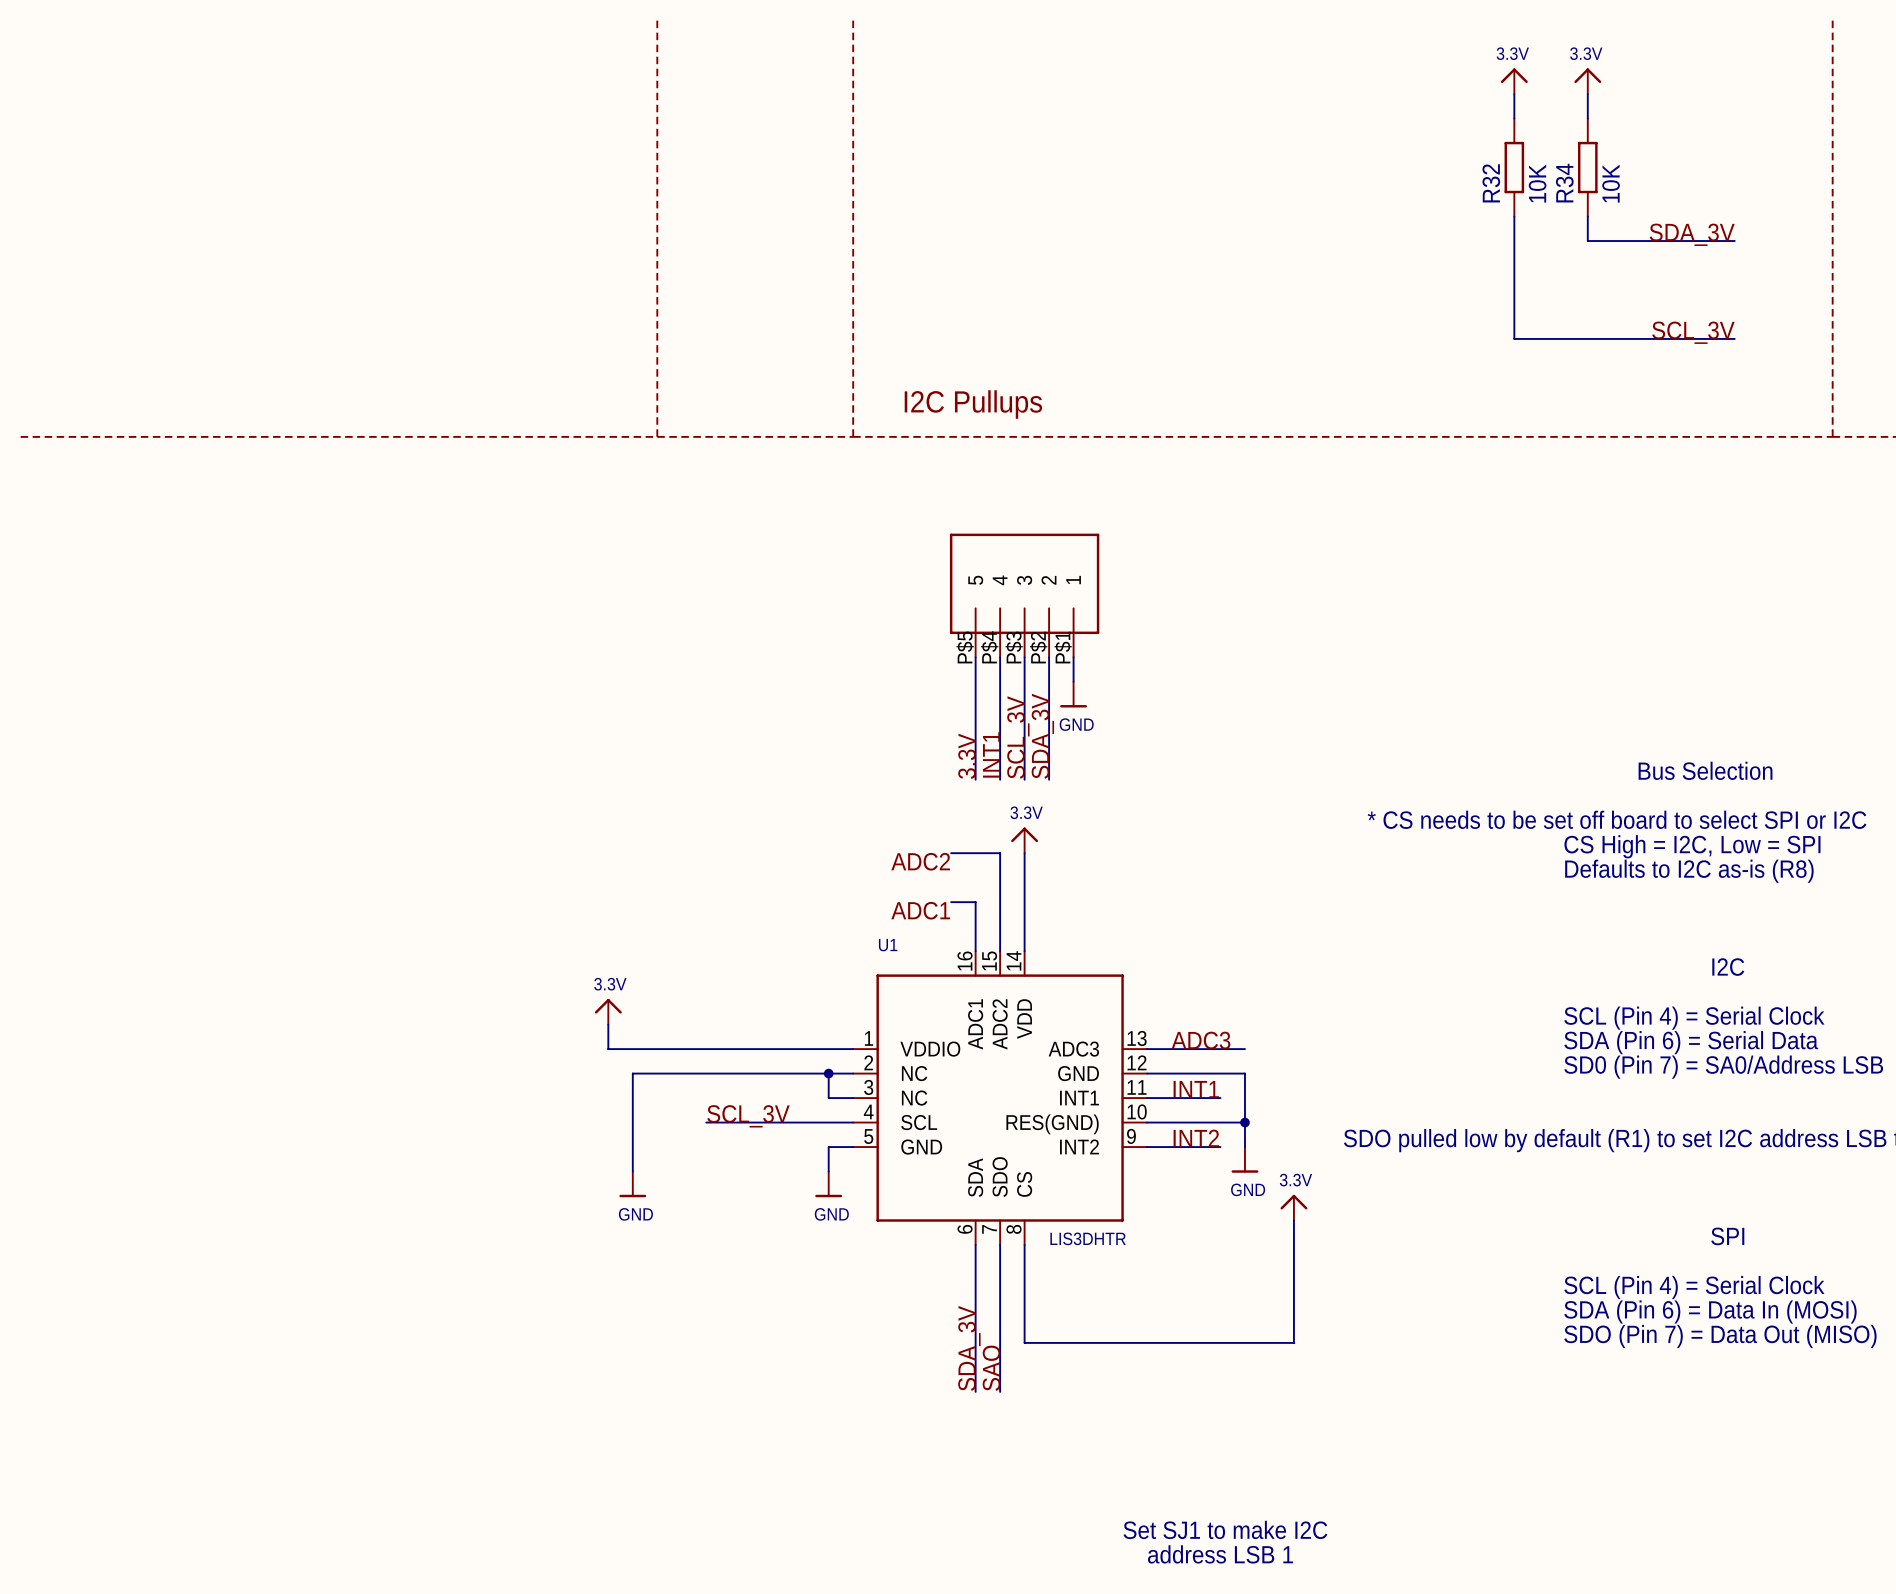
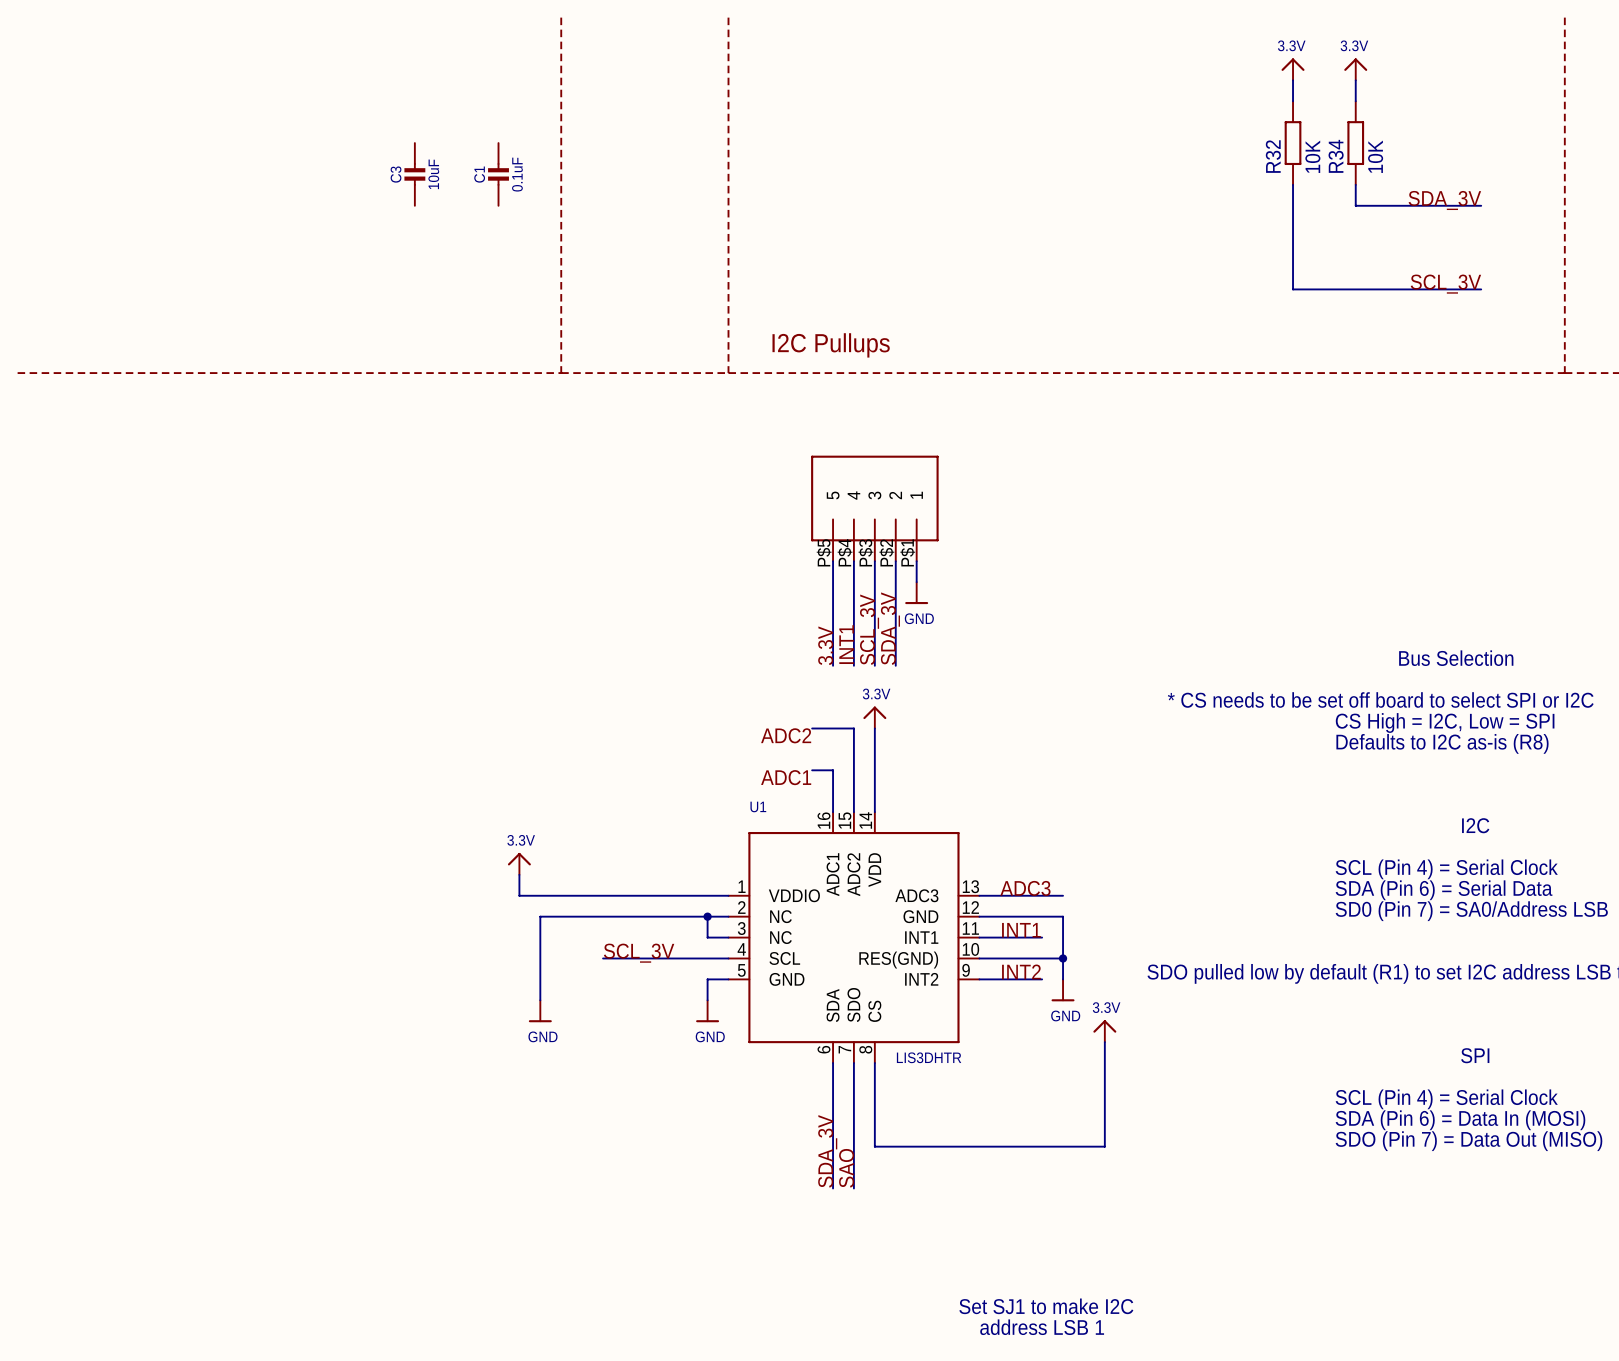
C3: none -> 10uF (414, 174)
C1: none -> 0.1uF (498, 174)

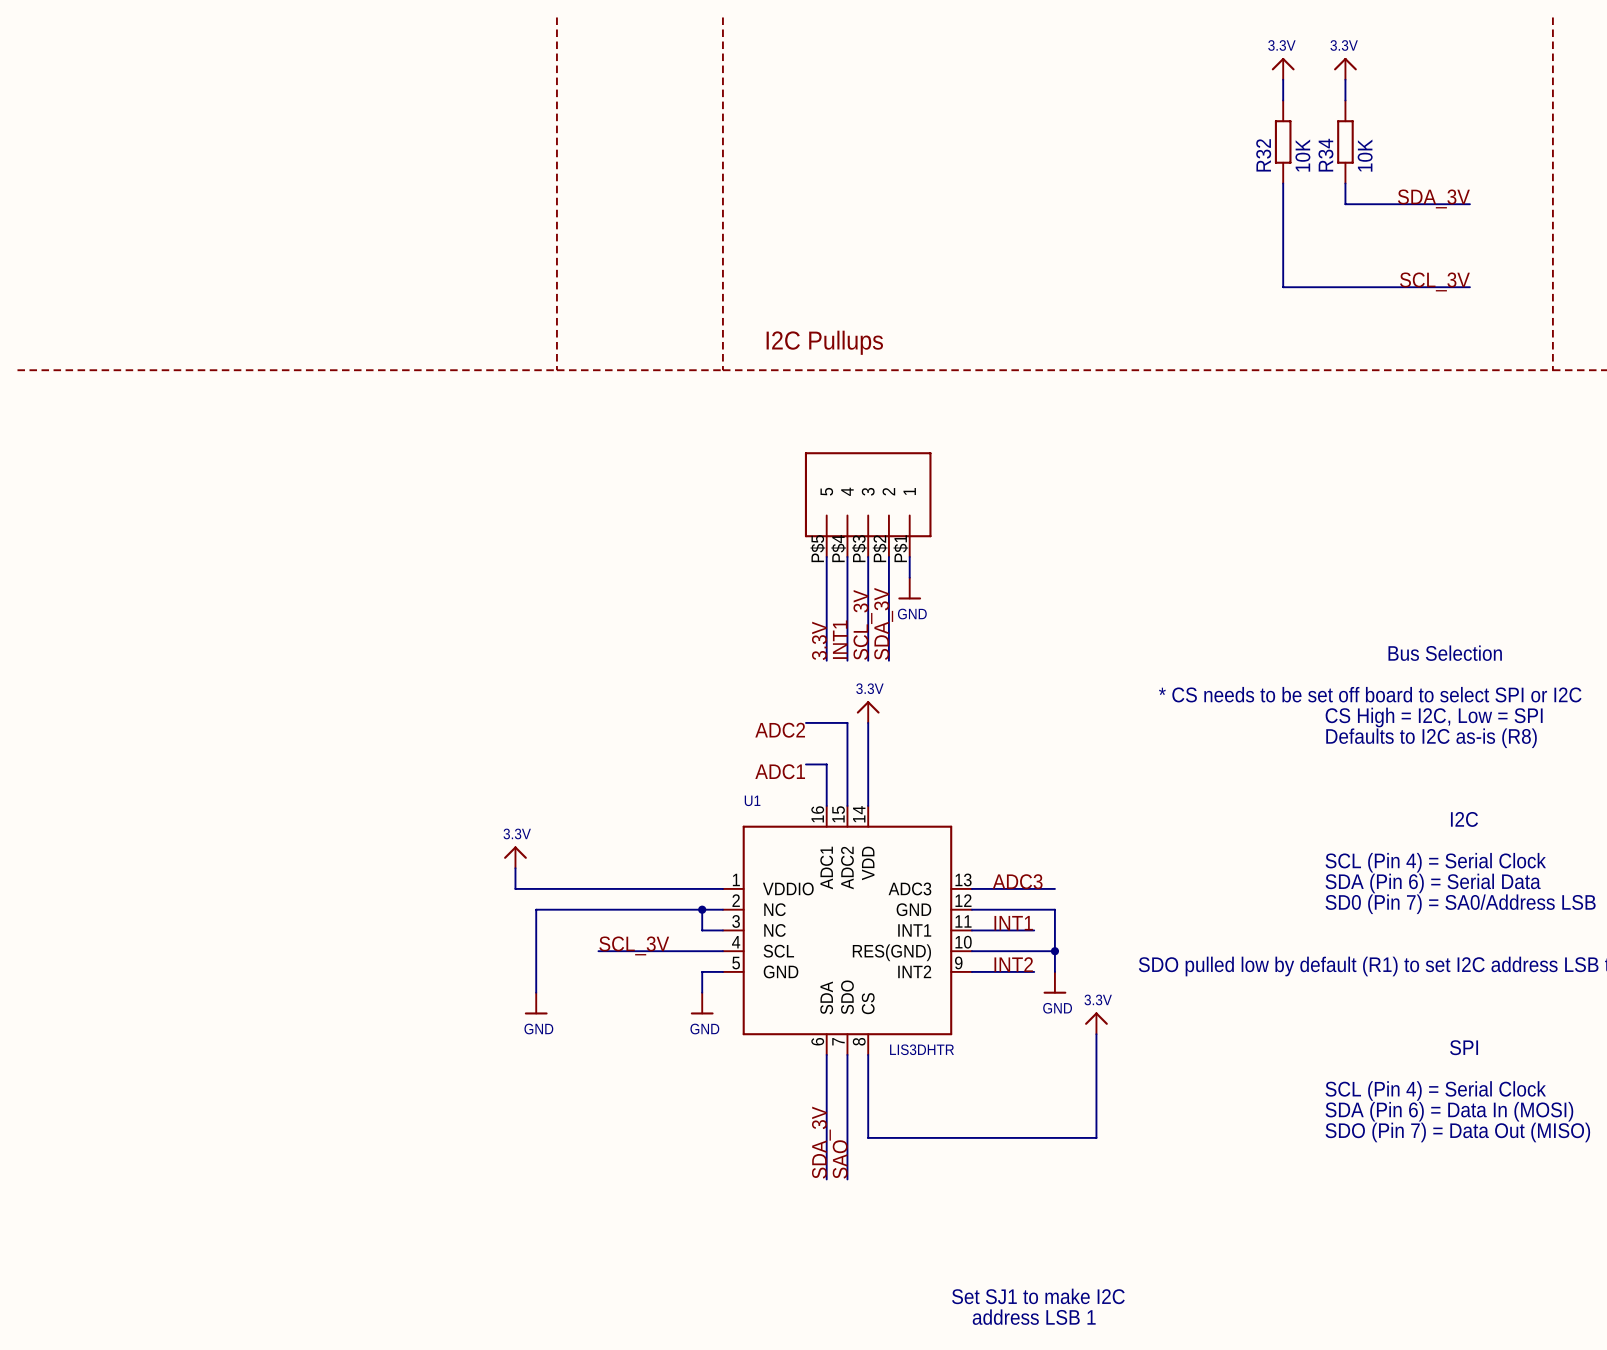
C3: 10uF (414, 174) -> none
C1: 0.1uF (498, 174) -> none

